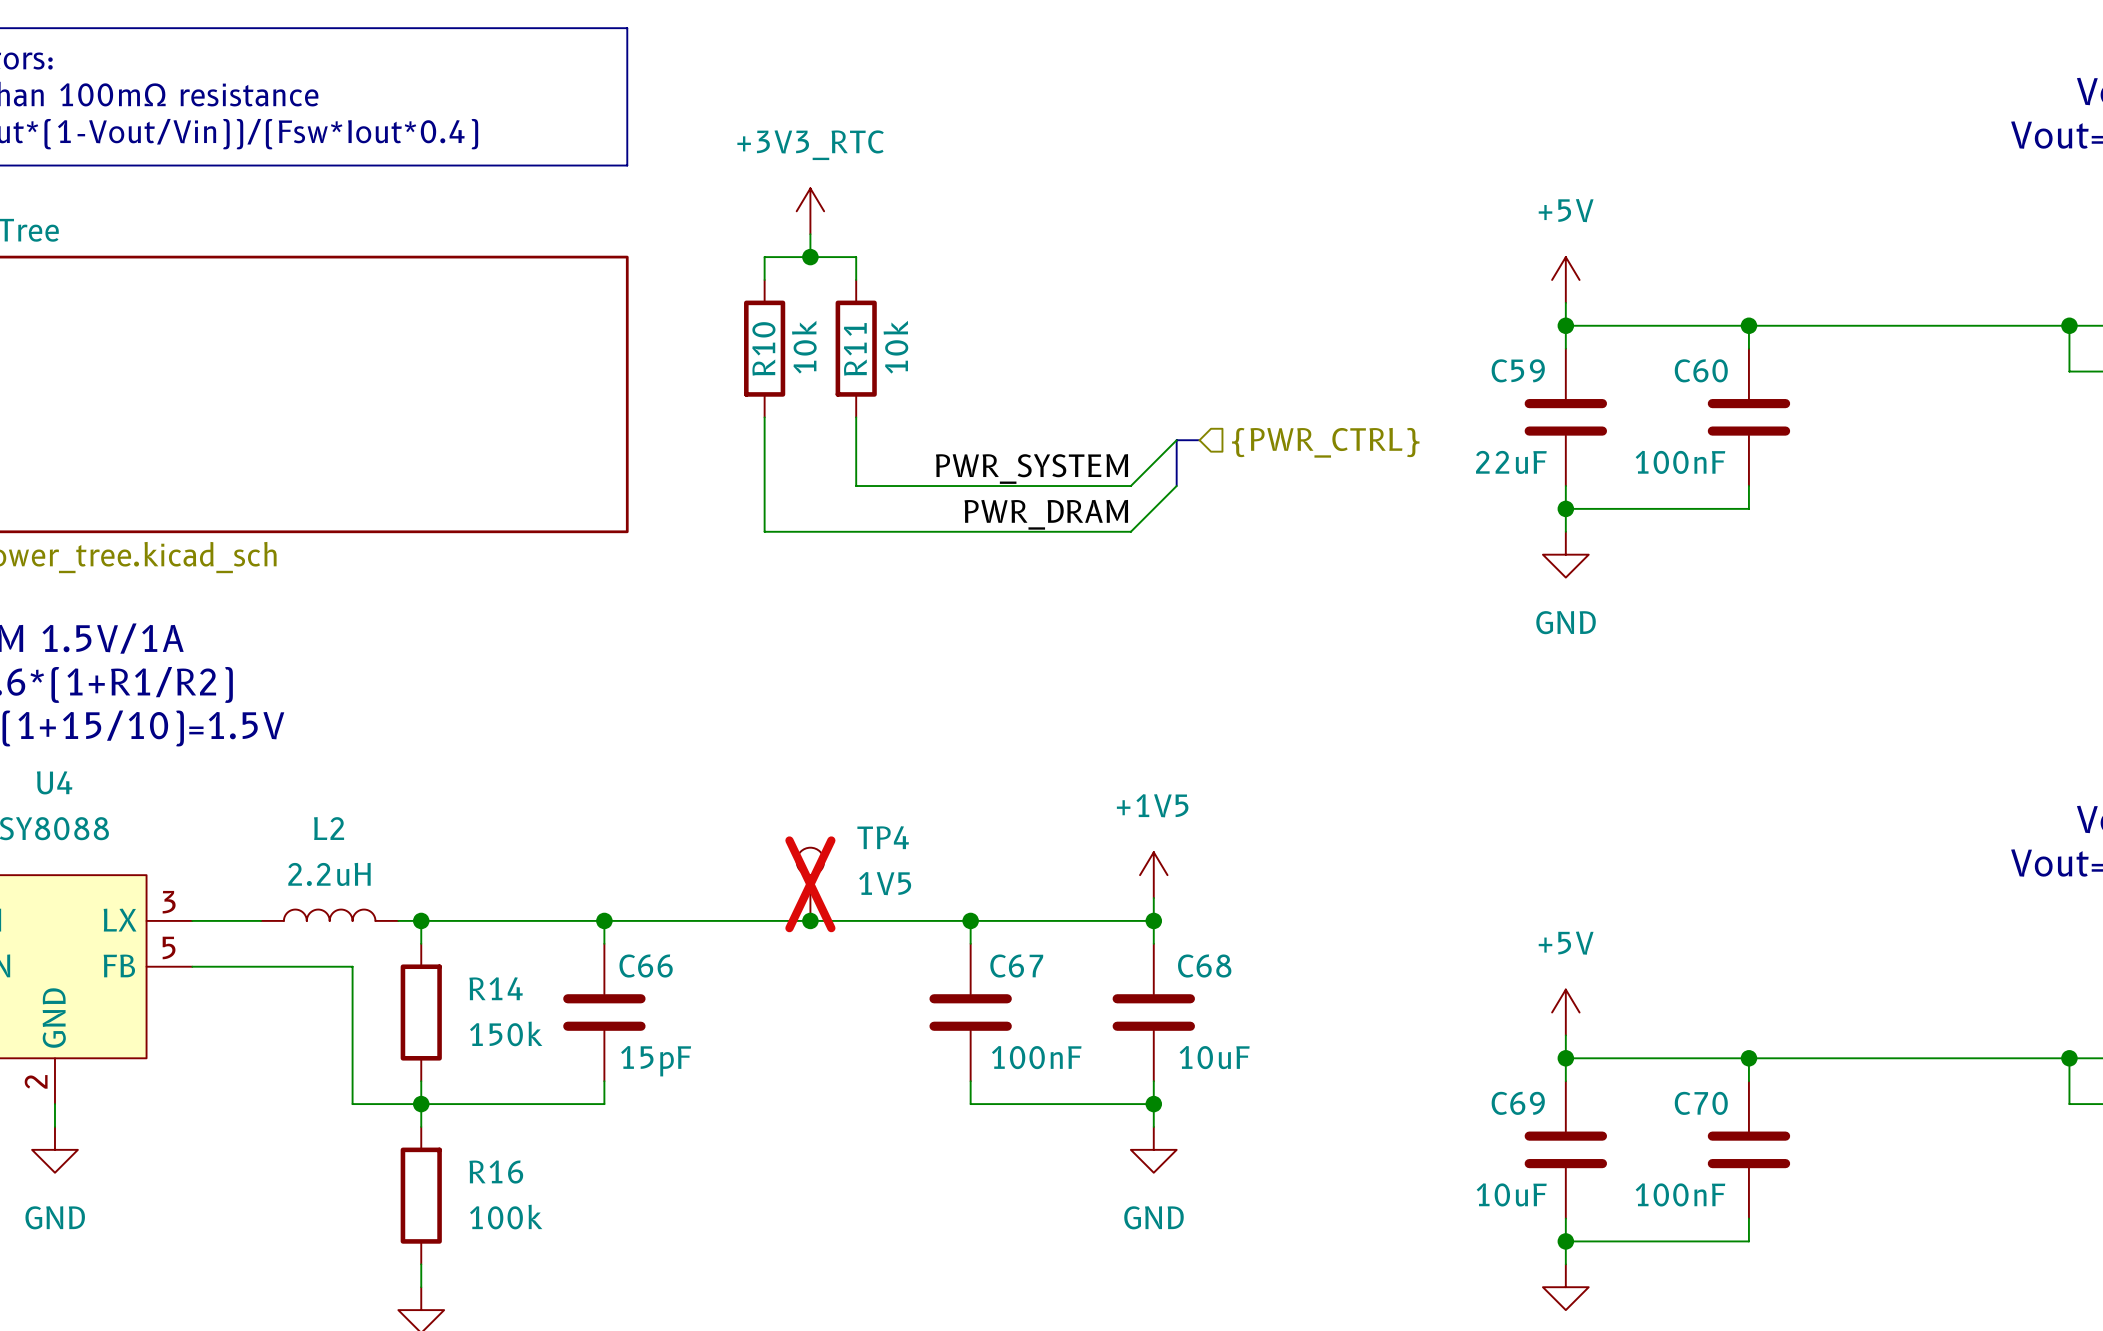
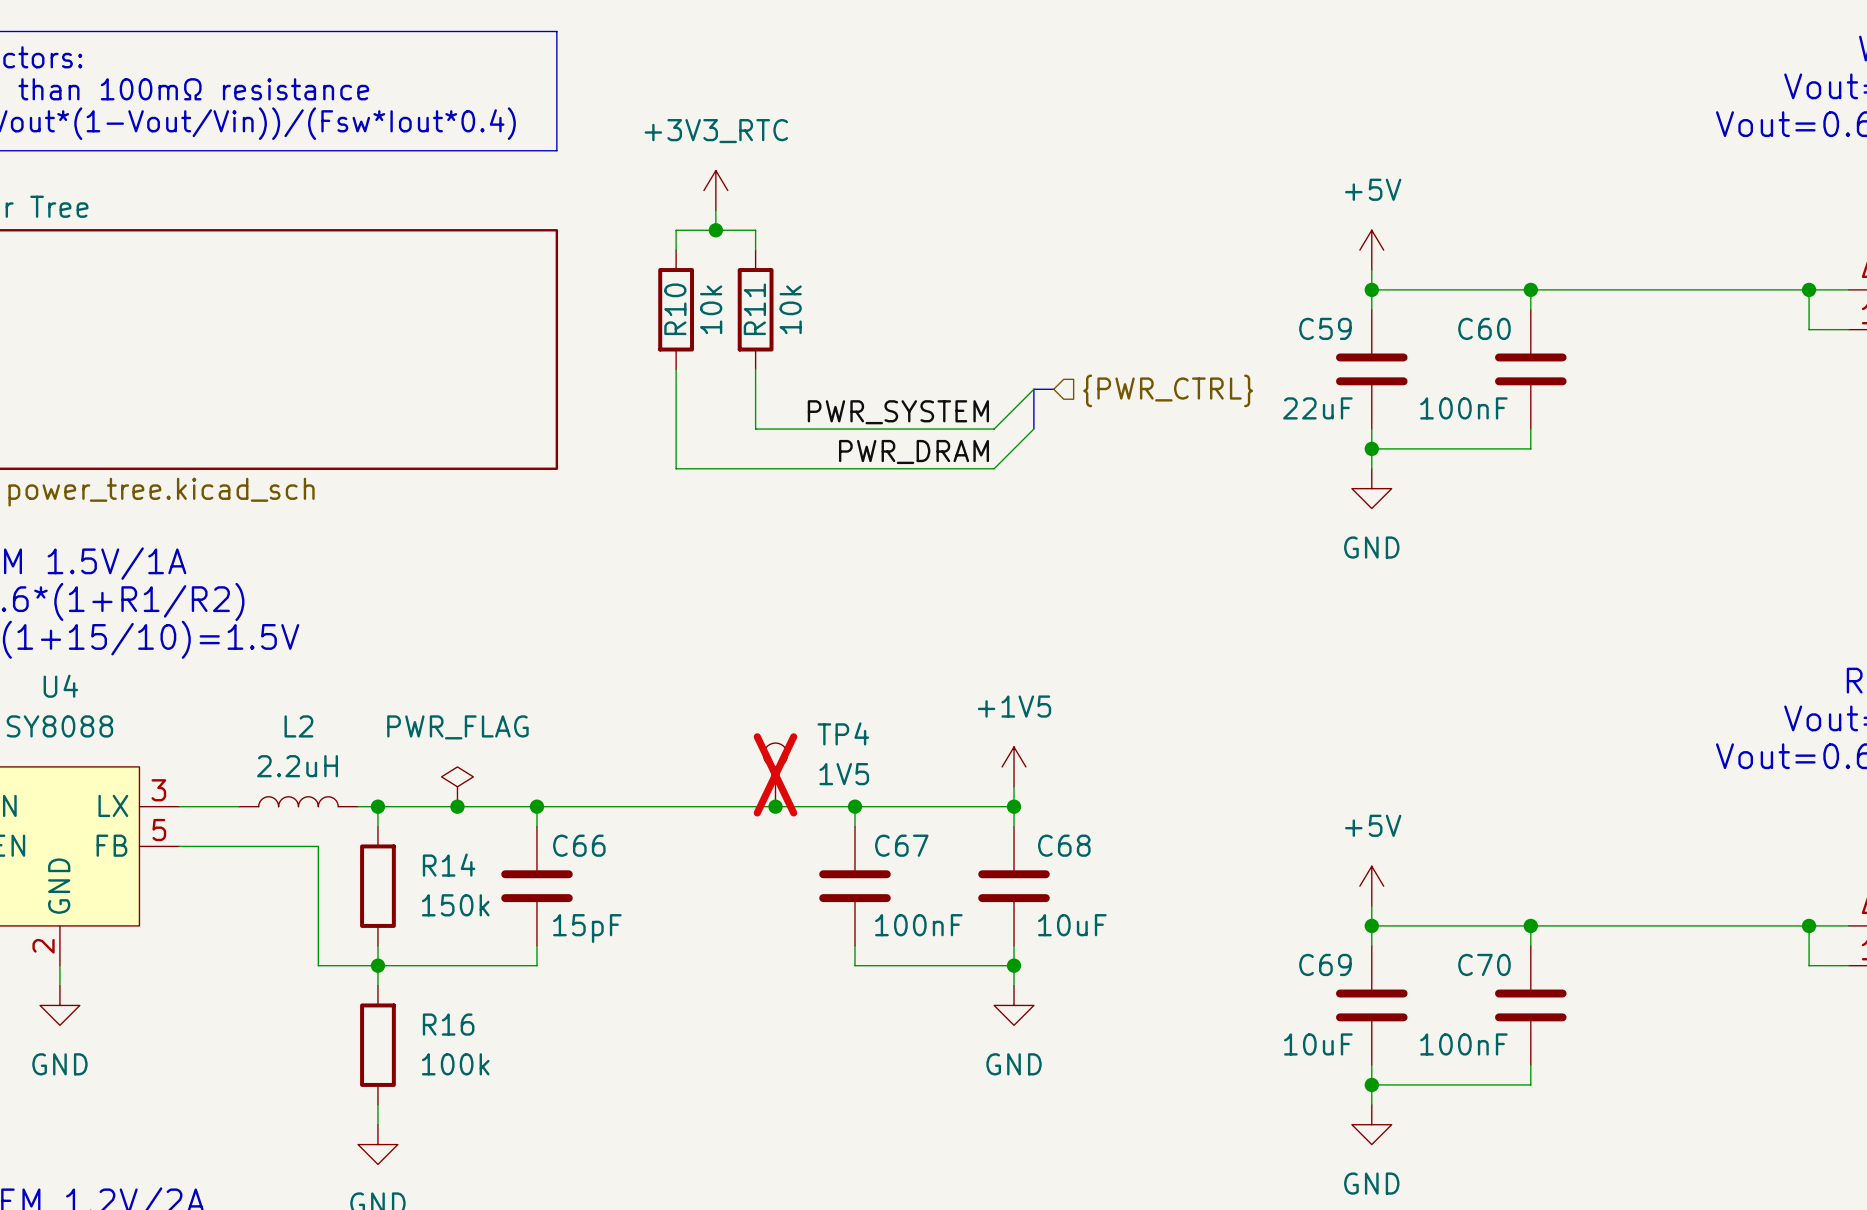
TP4 position: (810, 884) -> (775, 774)
power symbol: none -> PWR_FLAG (457, 786)
junction: none -> (457, 806)
junction position: (810, 920) -> (775, 806)

